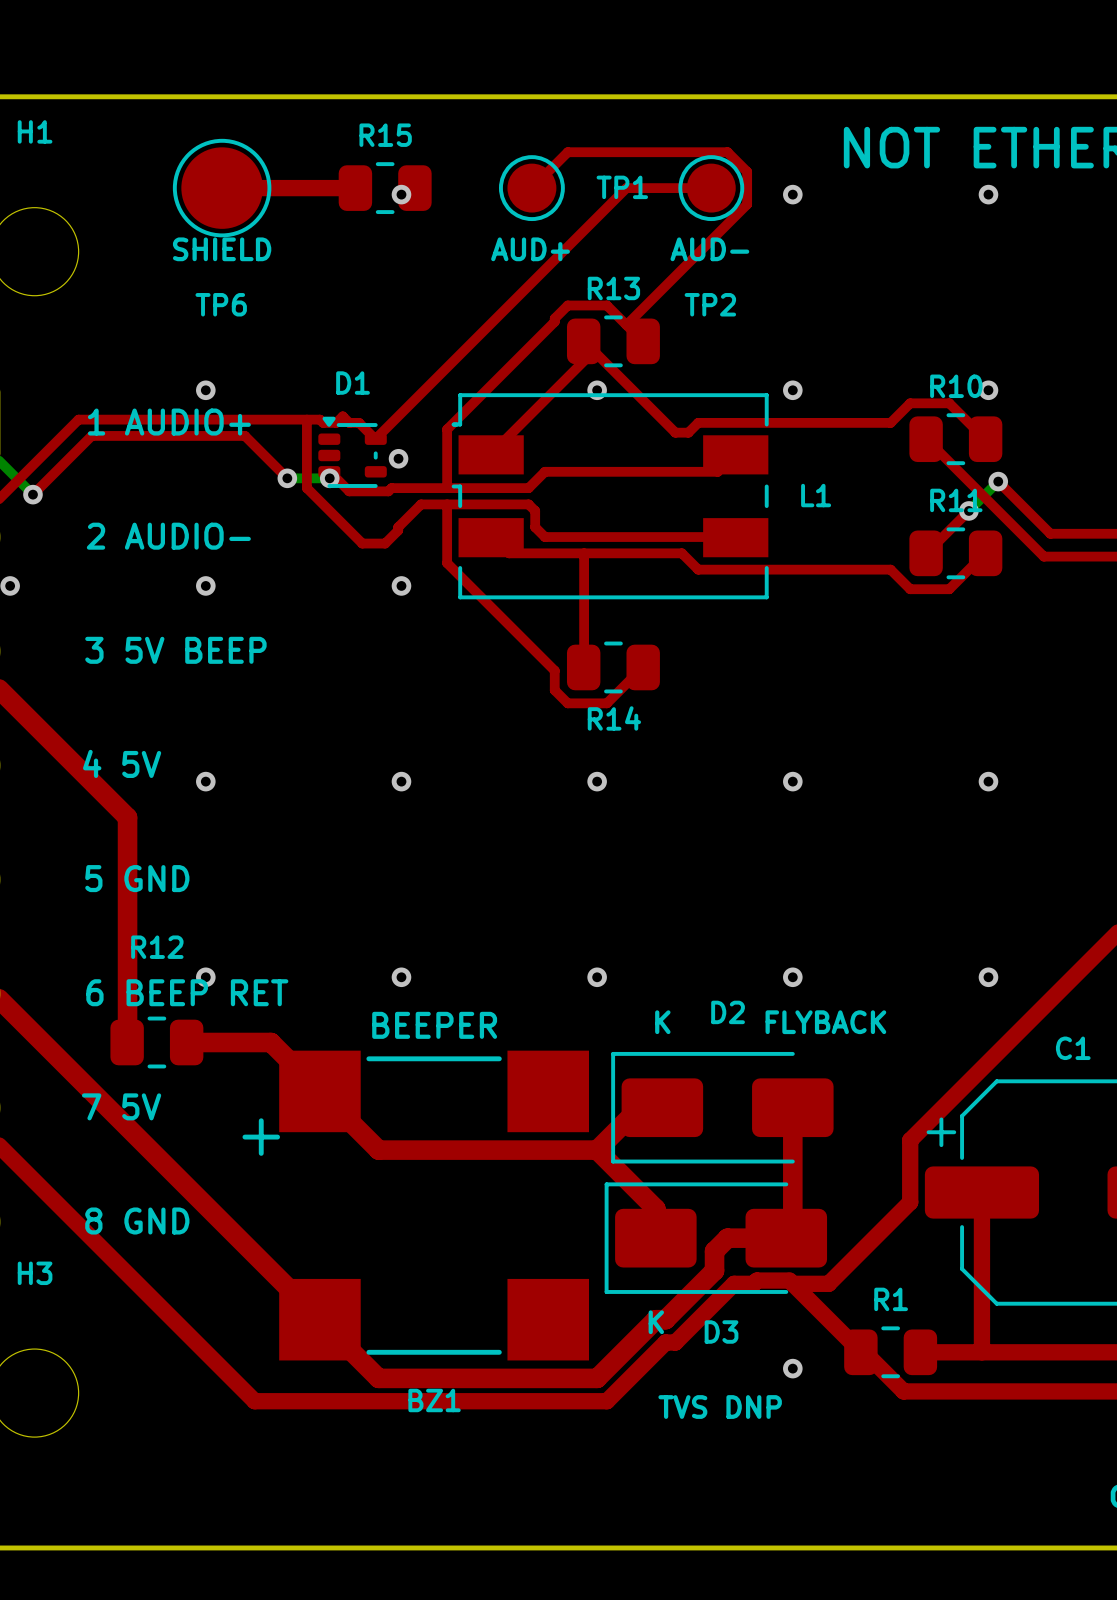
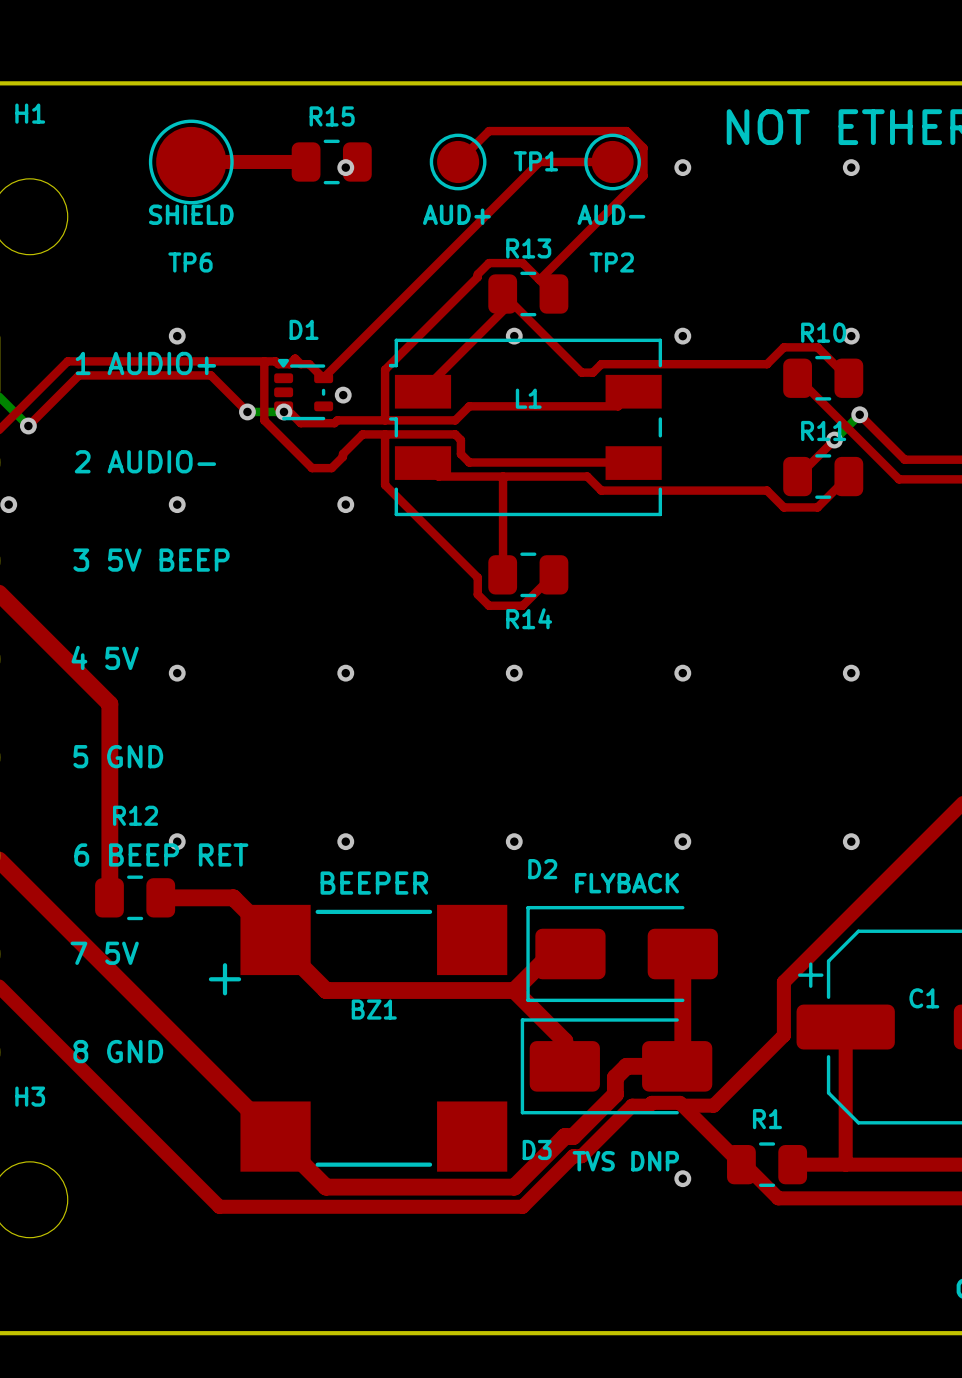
L1 name position: L1 (816, 495) -> L1 (528, 398)
D2 name position: D2 (728, 1012) -> D2 (542, 869)
text: K (662, 1022) -> none
text position: FLYBACK (825, 1022) -> FLYBACK (627, 883)
C1 name position: C1 (1073, 1048) -> C1 (924, 998)
text: K (656, 1322) -> none
D3 name position: D3 (721, 1332) -> D3 (537, 1149)
BZ1 name position: BZ1 (434, 1400) -> BZ1 (374, 1009)
text position: TVS DNP (720, 1407) -> TVS DNP (625, 1161)

